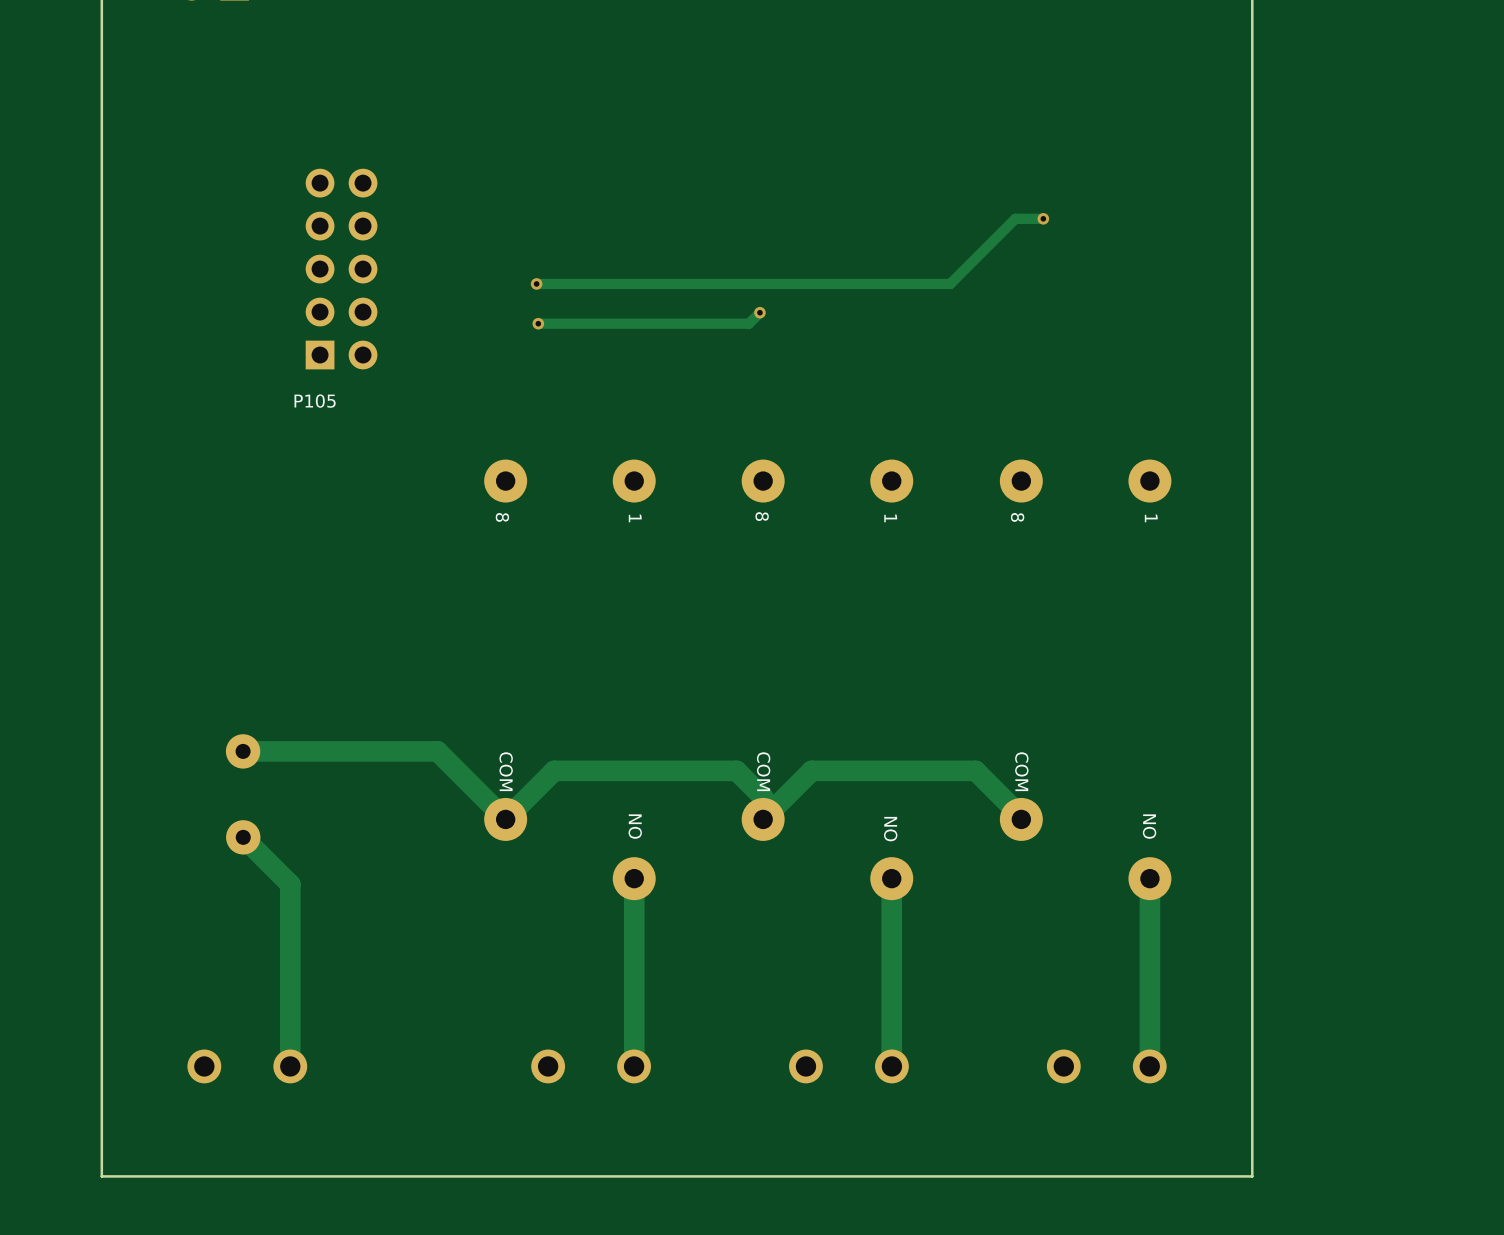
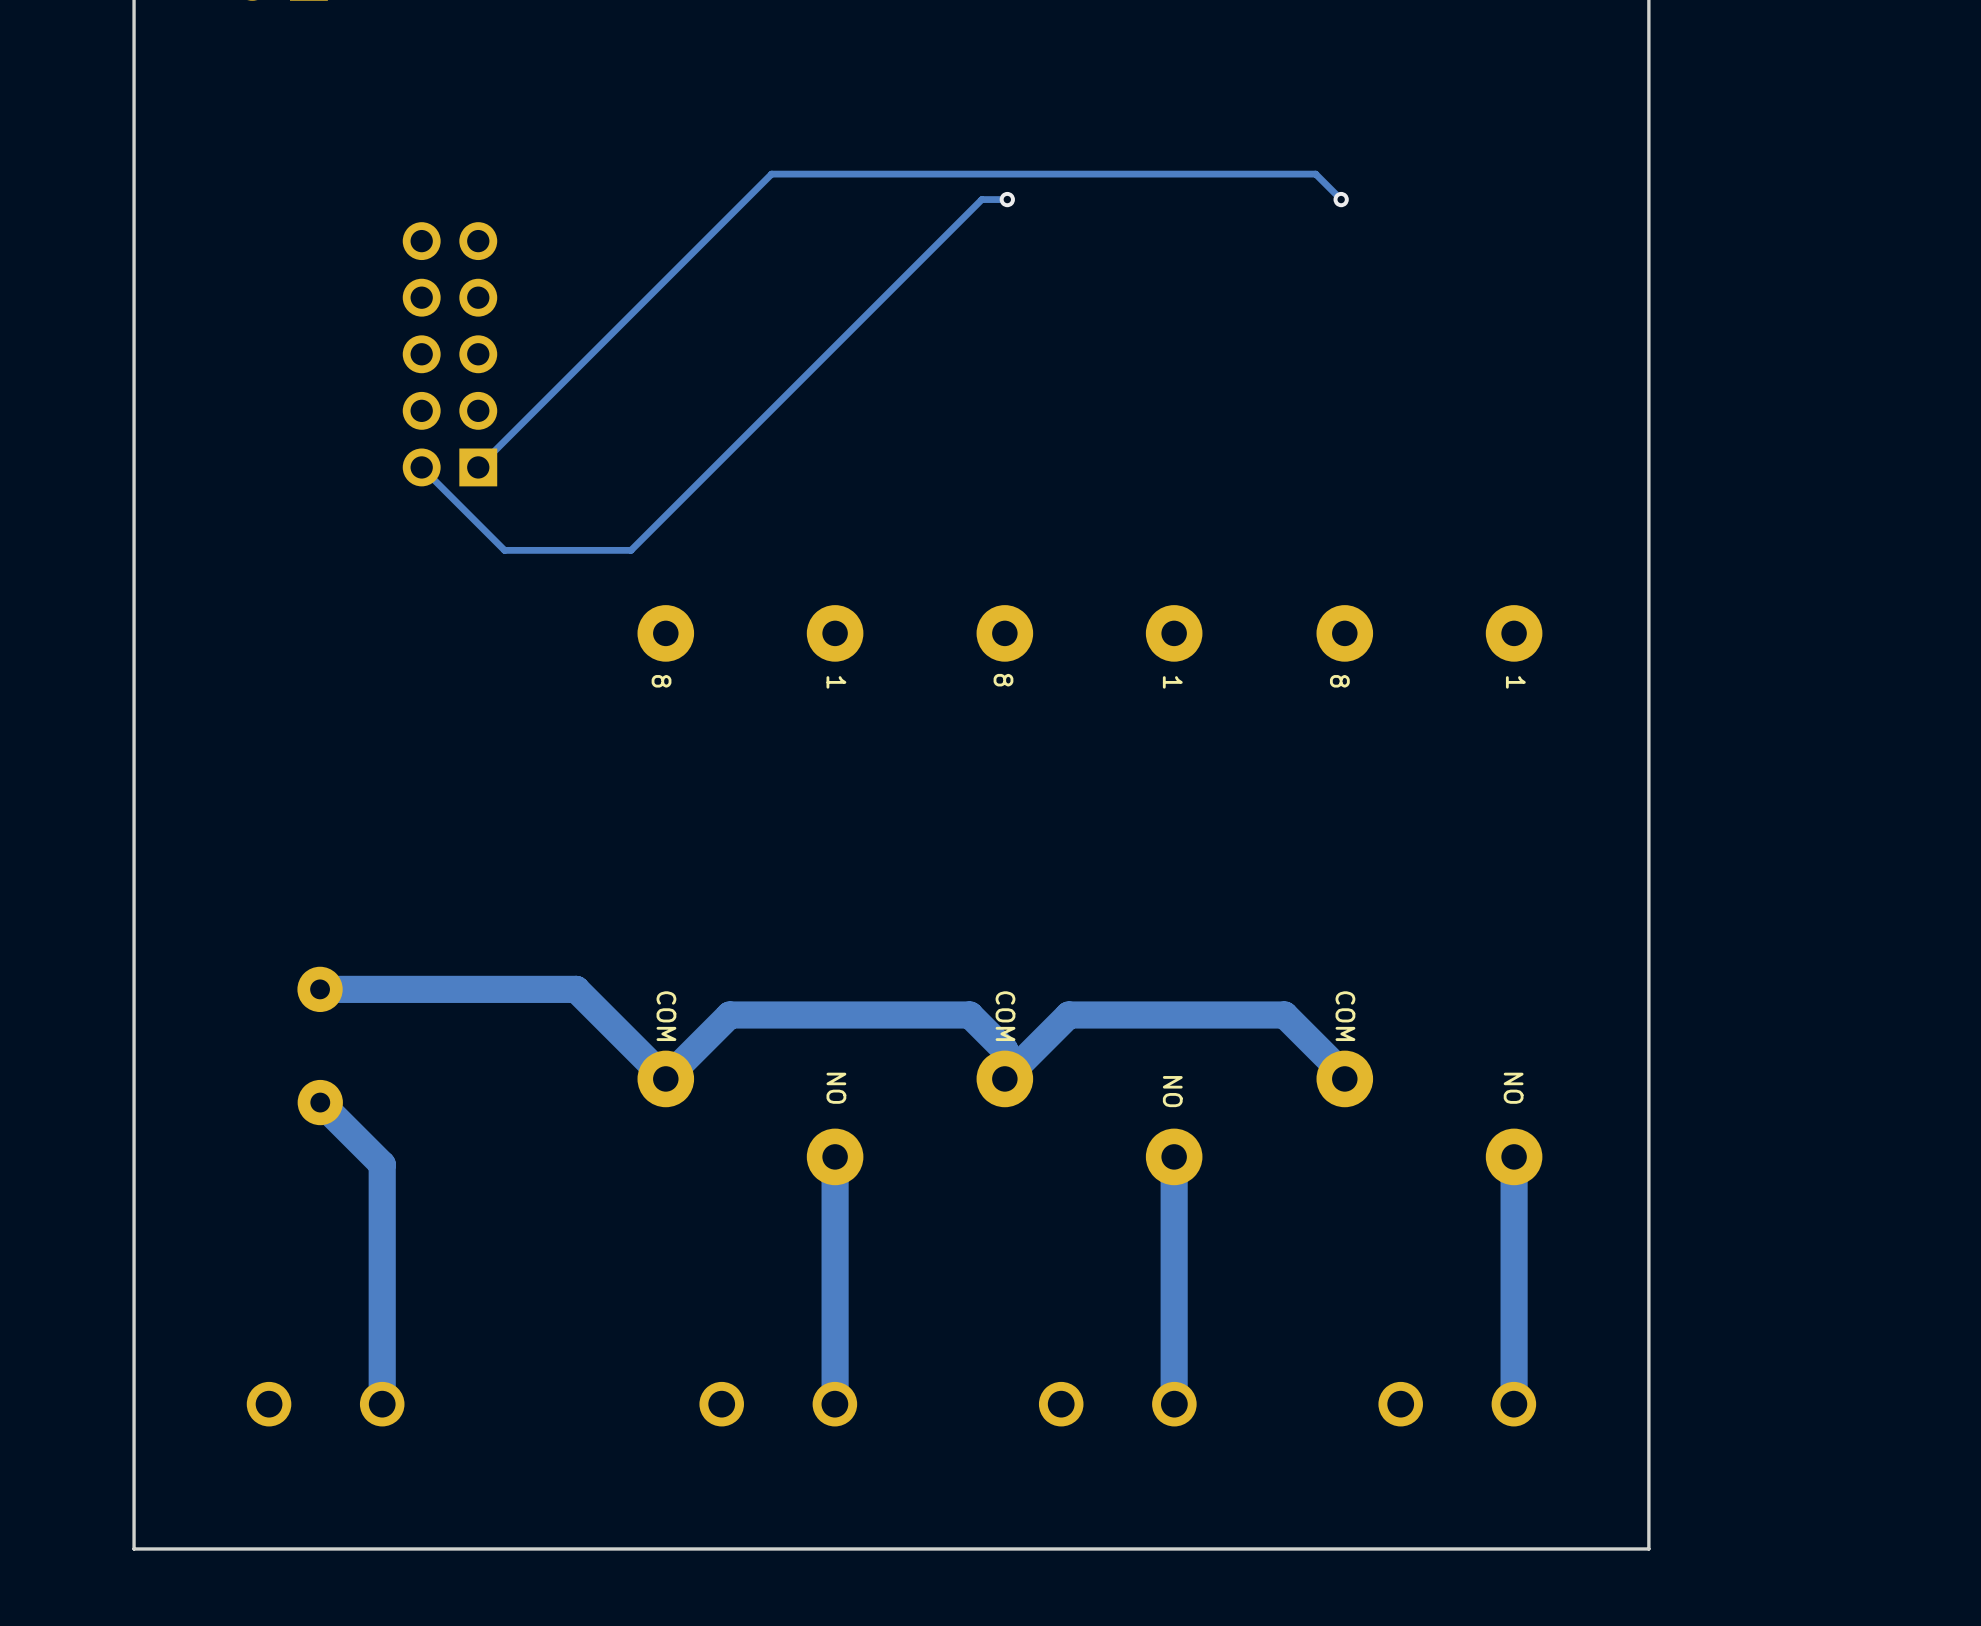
track: none -> (1007, 199) (981, 199) (631, 550) (504, 550) (421, 467)
via: none -> (1007, 199)
track: none -> (1341, 199) (1315, 174) (771, 174) (478, 467)
track: (1043, 218) (1015, 218) (950, 283) (536, 283) -> none
via position: (1043, 218) -> (1341, 199)
P105: (341, 269) -> none
part: none -> (449, 354)
via: (536, 283) -> none
track: (759, 312) (748, 323) (538, 323) -> none
via: (759, 312) -> none
via: (538, 323) -> none

